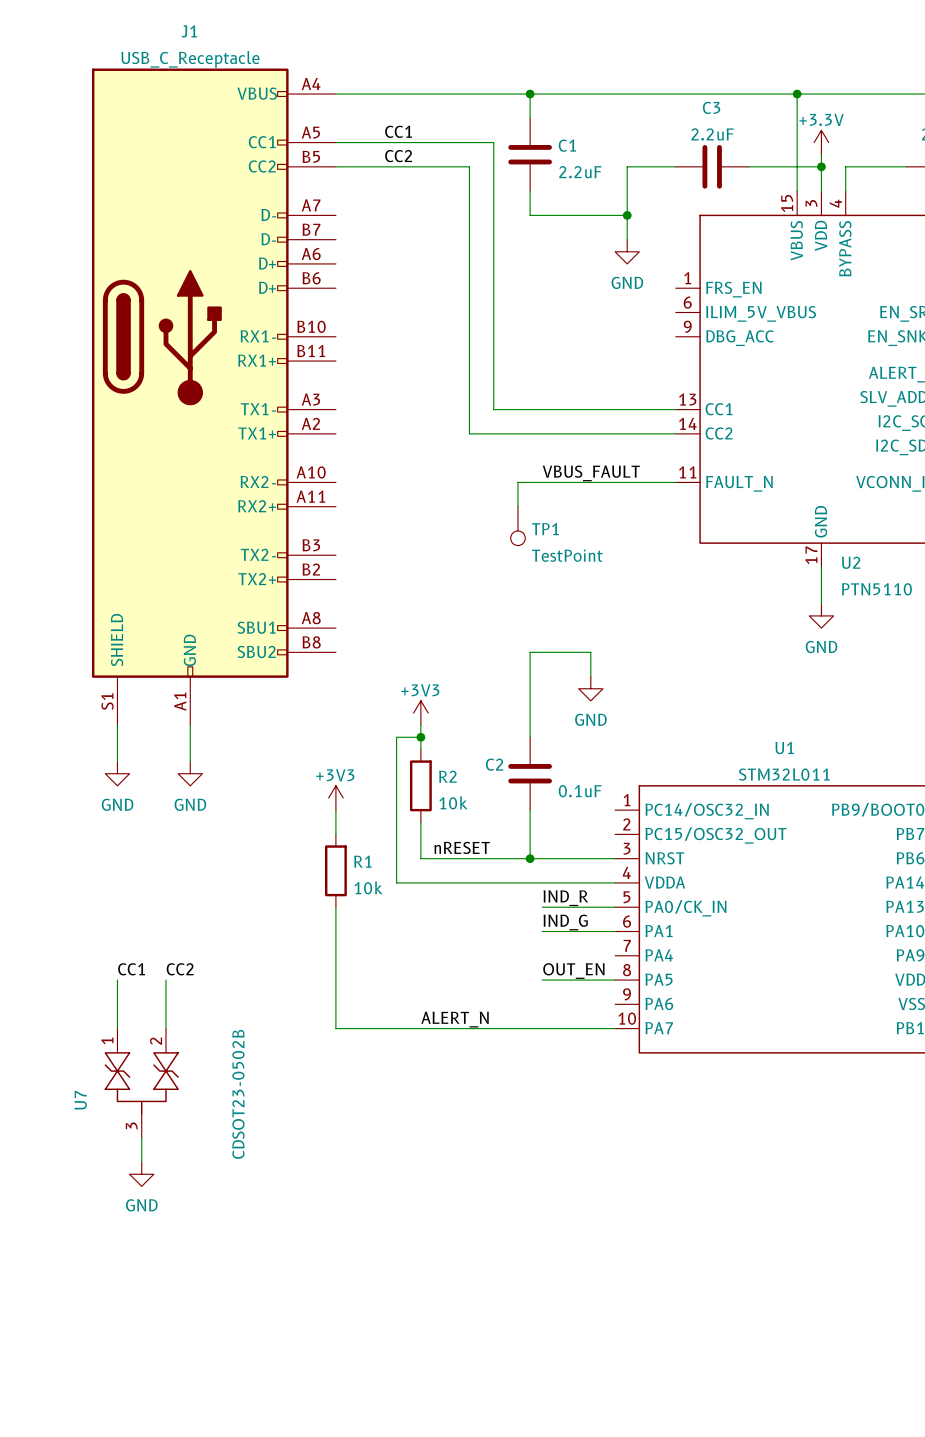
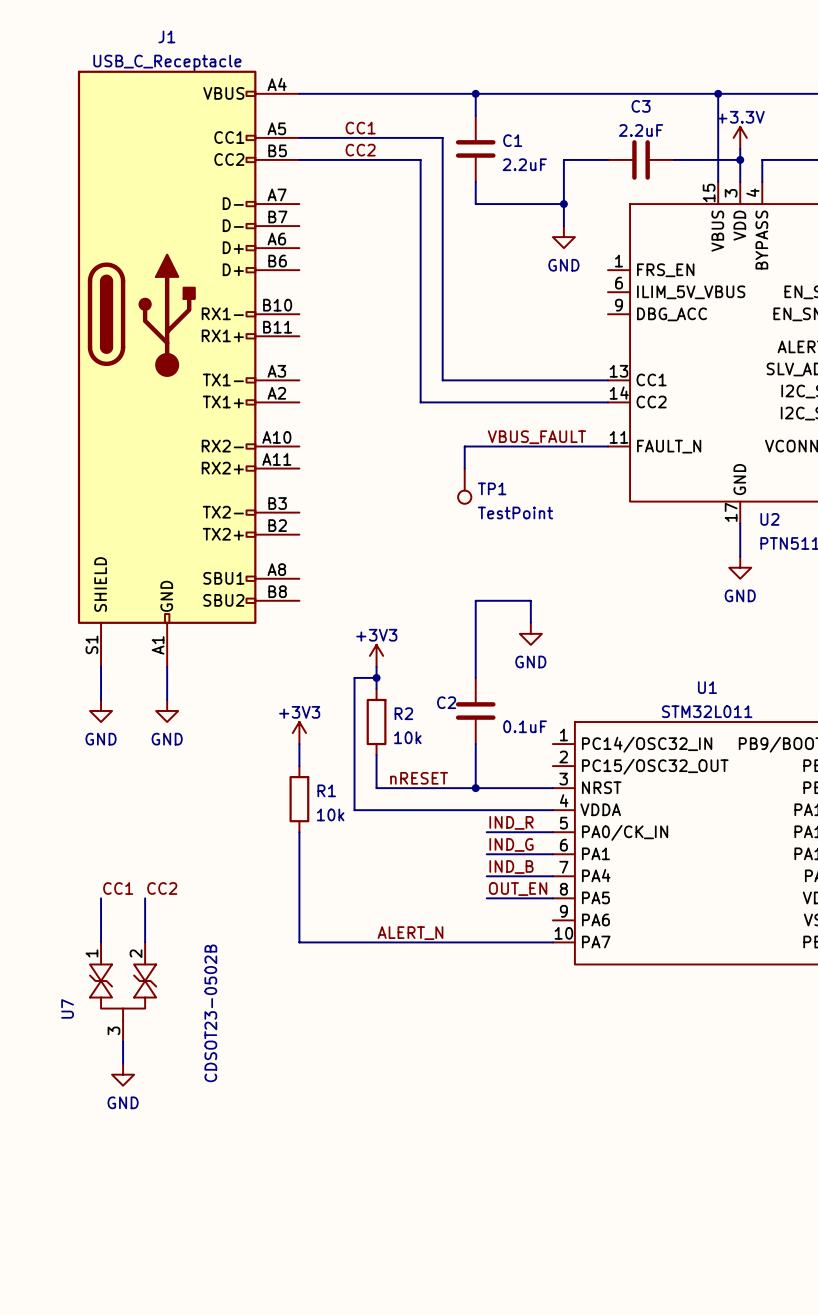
label: none -> IND_B (511, 866)
wire: none -> (486, 876) (552, 876)

